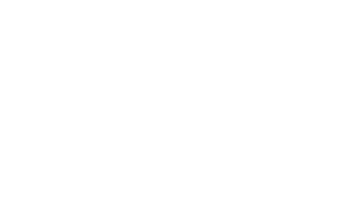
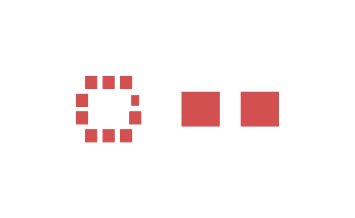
part: none -> (108, 109)
part: none -> (230, 109)

